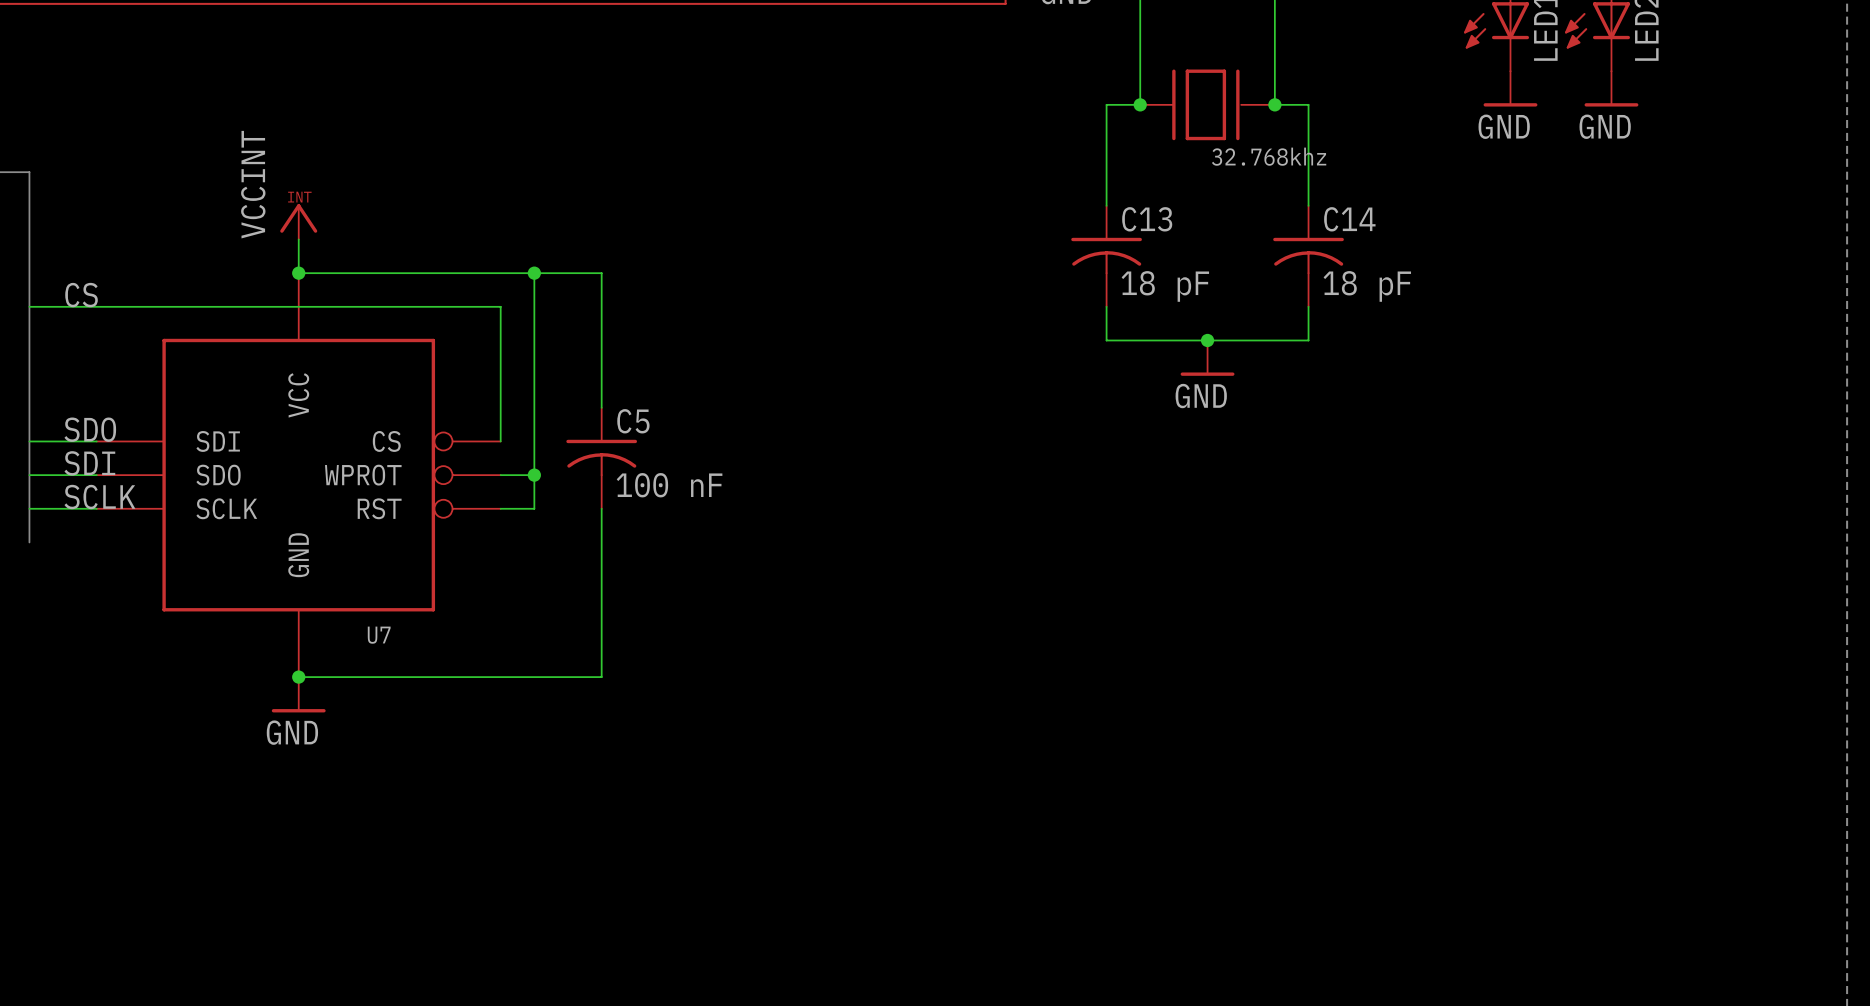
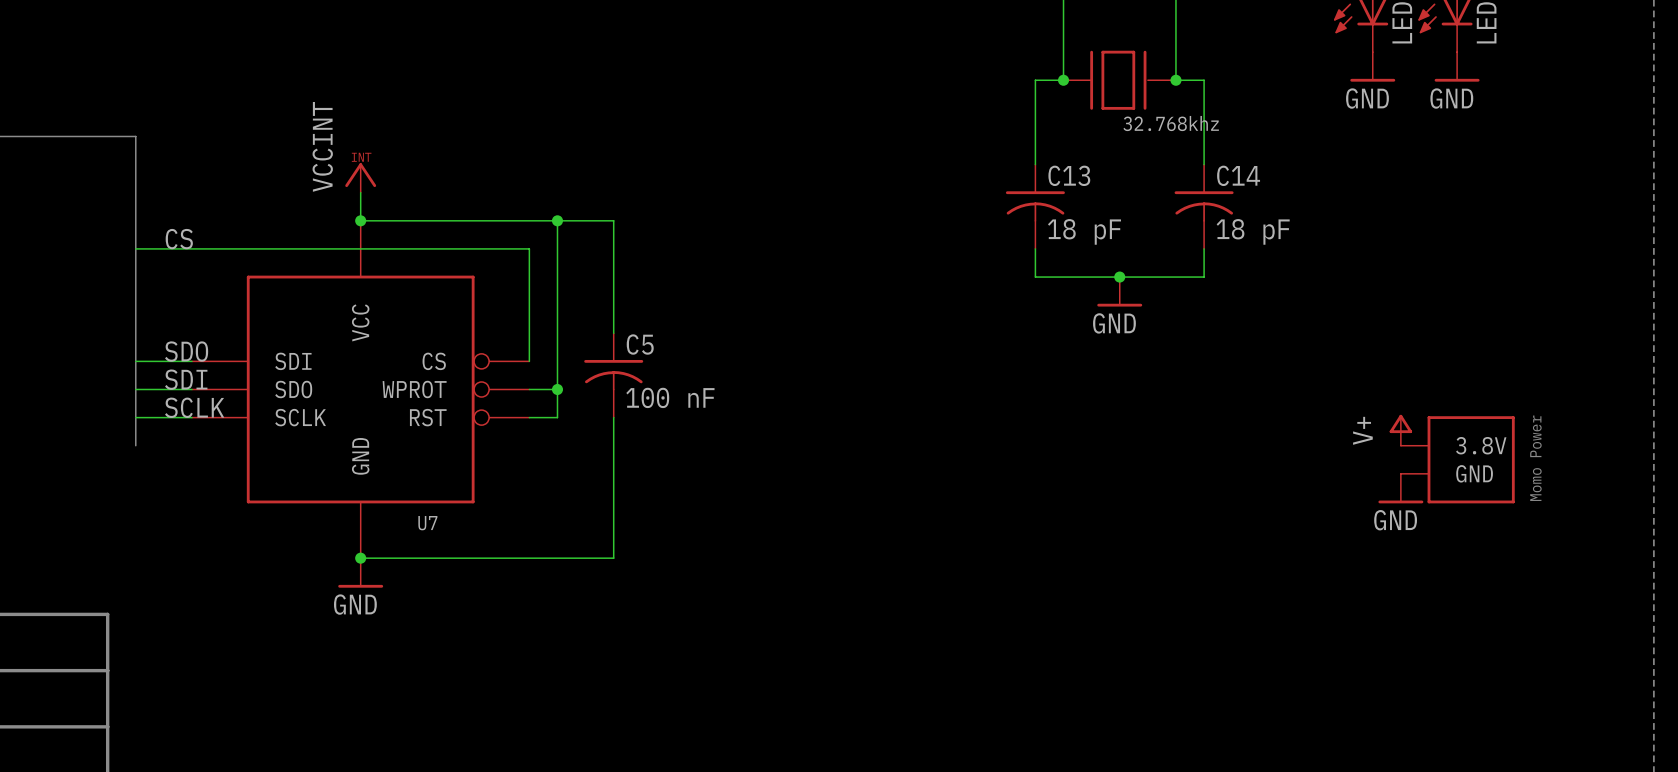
power symbol: none -> V+ (1400, 430)
part: none -> (1457, 459)
power symbol: none -> GND (1400, 488)

